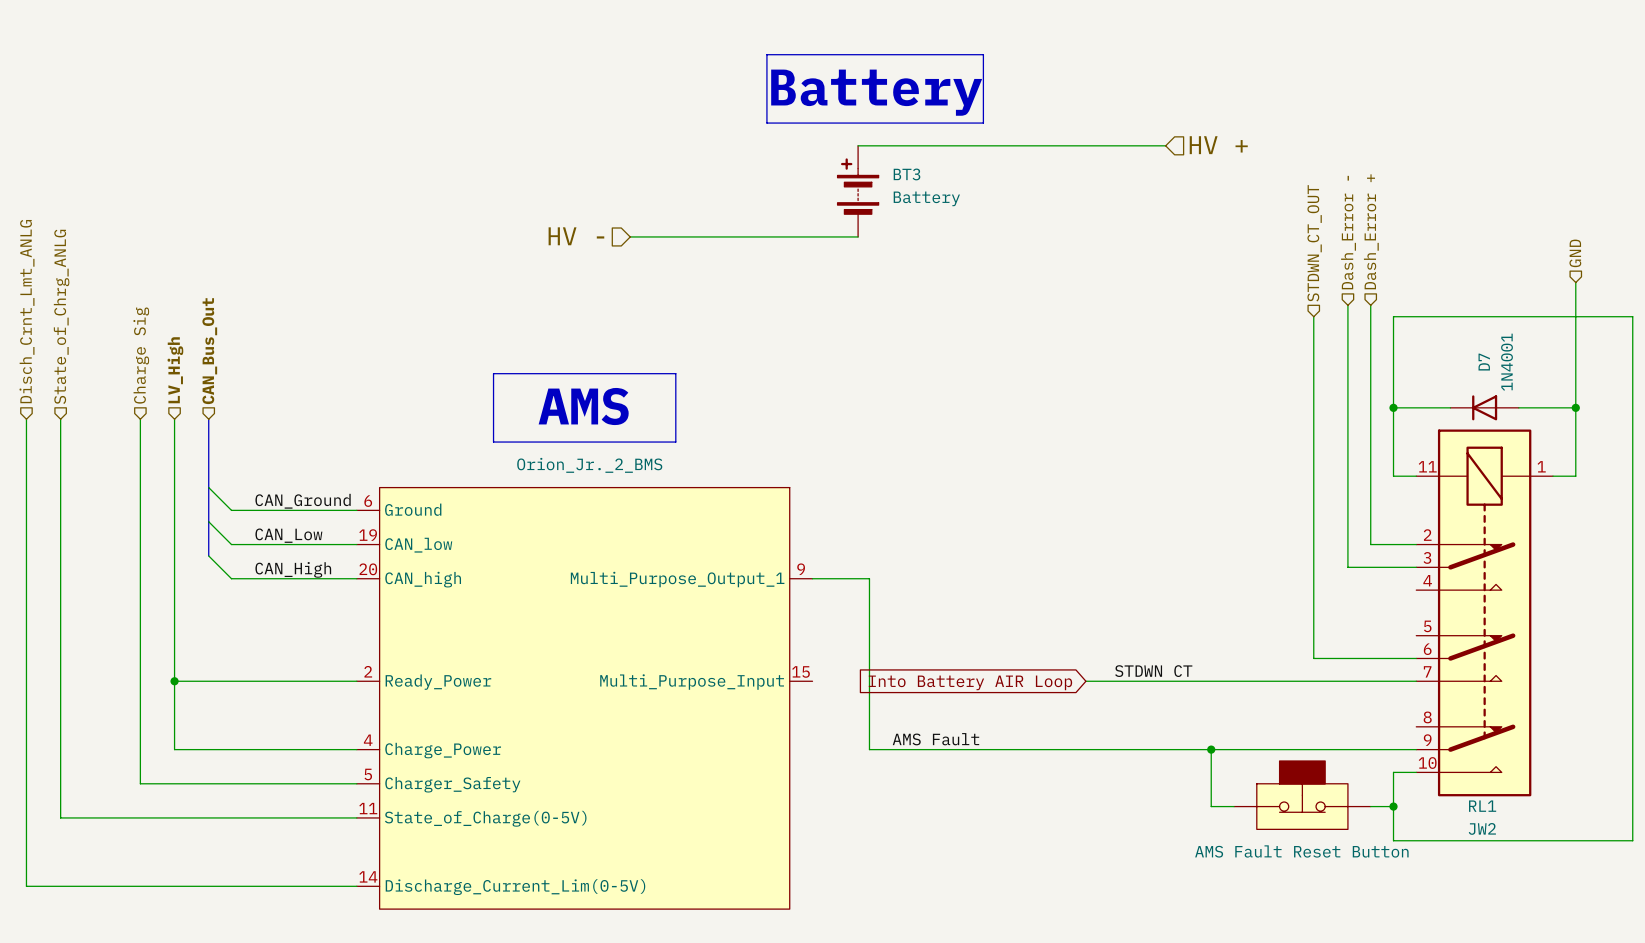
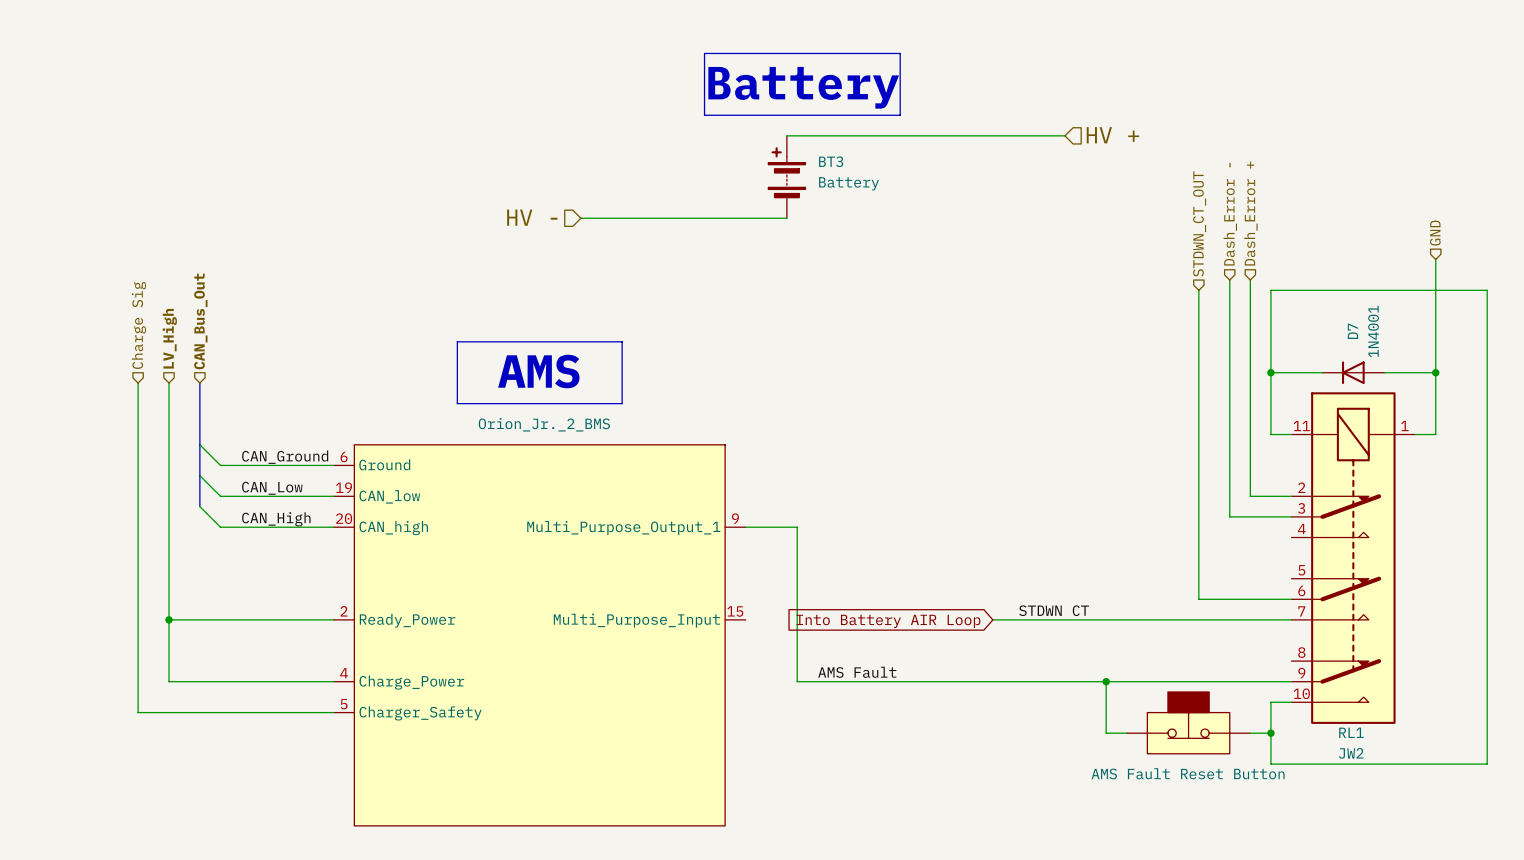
hierarchical label: Disch_Crnt_Lmt_ANLG (27, 311) -> none
hierarchical label: State_of_Chrg_ANLG (61, 316) -> none
wire: (26, 419) (26, 886) (356, 886) -> none
wire: (60, 419) (60, 817) (356, 817) -> none
part symbol: [356, 487, 813, 910] -> [333, 444, 746, 826]

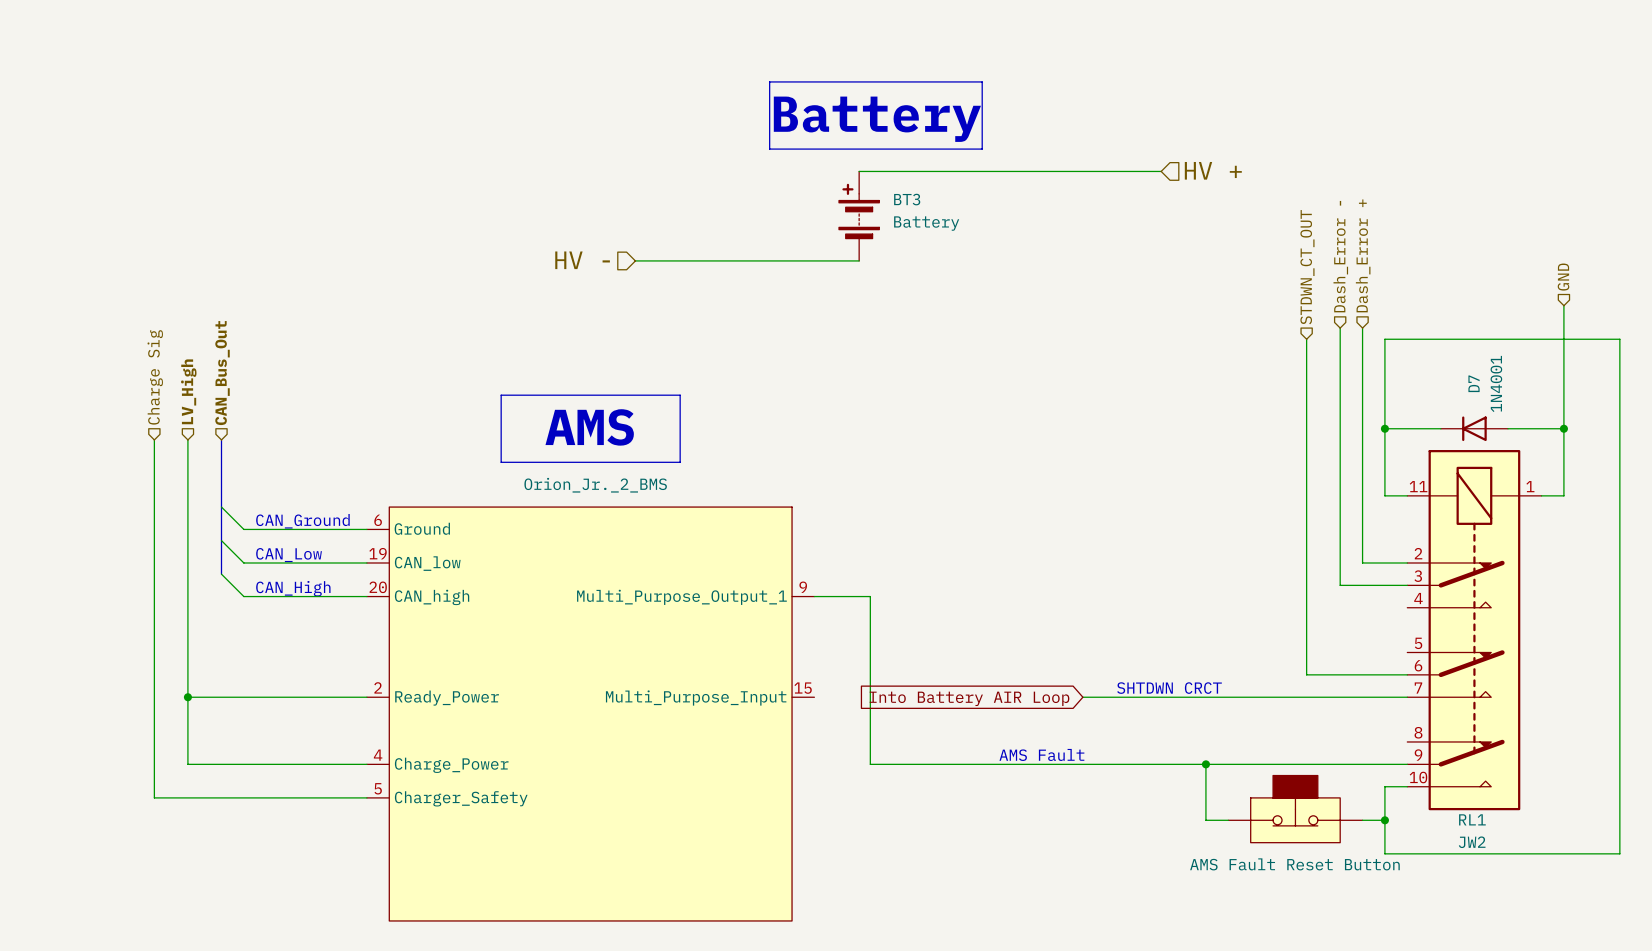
text: none -> CAN_Ground (302, 521)
label: CAN_Ground (285, 457) -> none
label: CAN_Low (272, 488) -> none
text: none -> CAN_Low (289, 555)
text: none -> CAN_High (293, 588)
label: CAN_High (276, 519) -> none
label: STDWN CT (1054, 610) -> none
text: none -> SHTDWN CRCT (1169, 688)
label: AMS Fault (857, 672) -> none
text: none -> AMS Fault (1041, 754)

